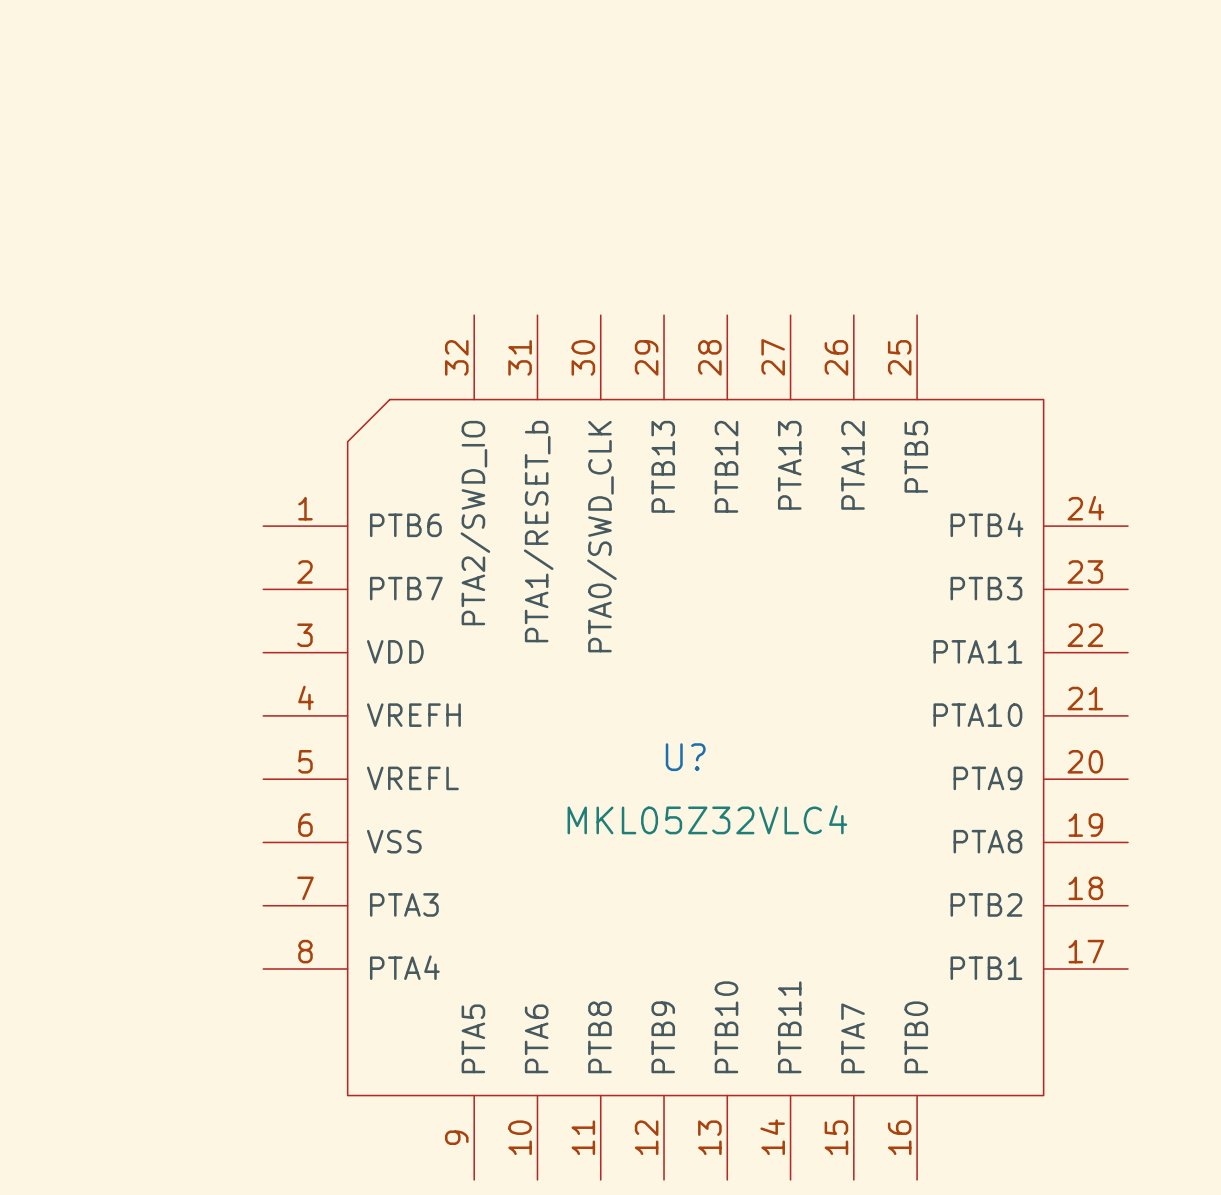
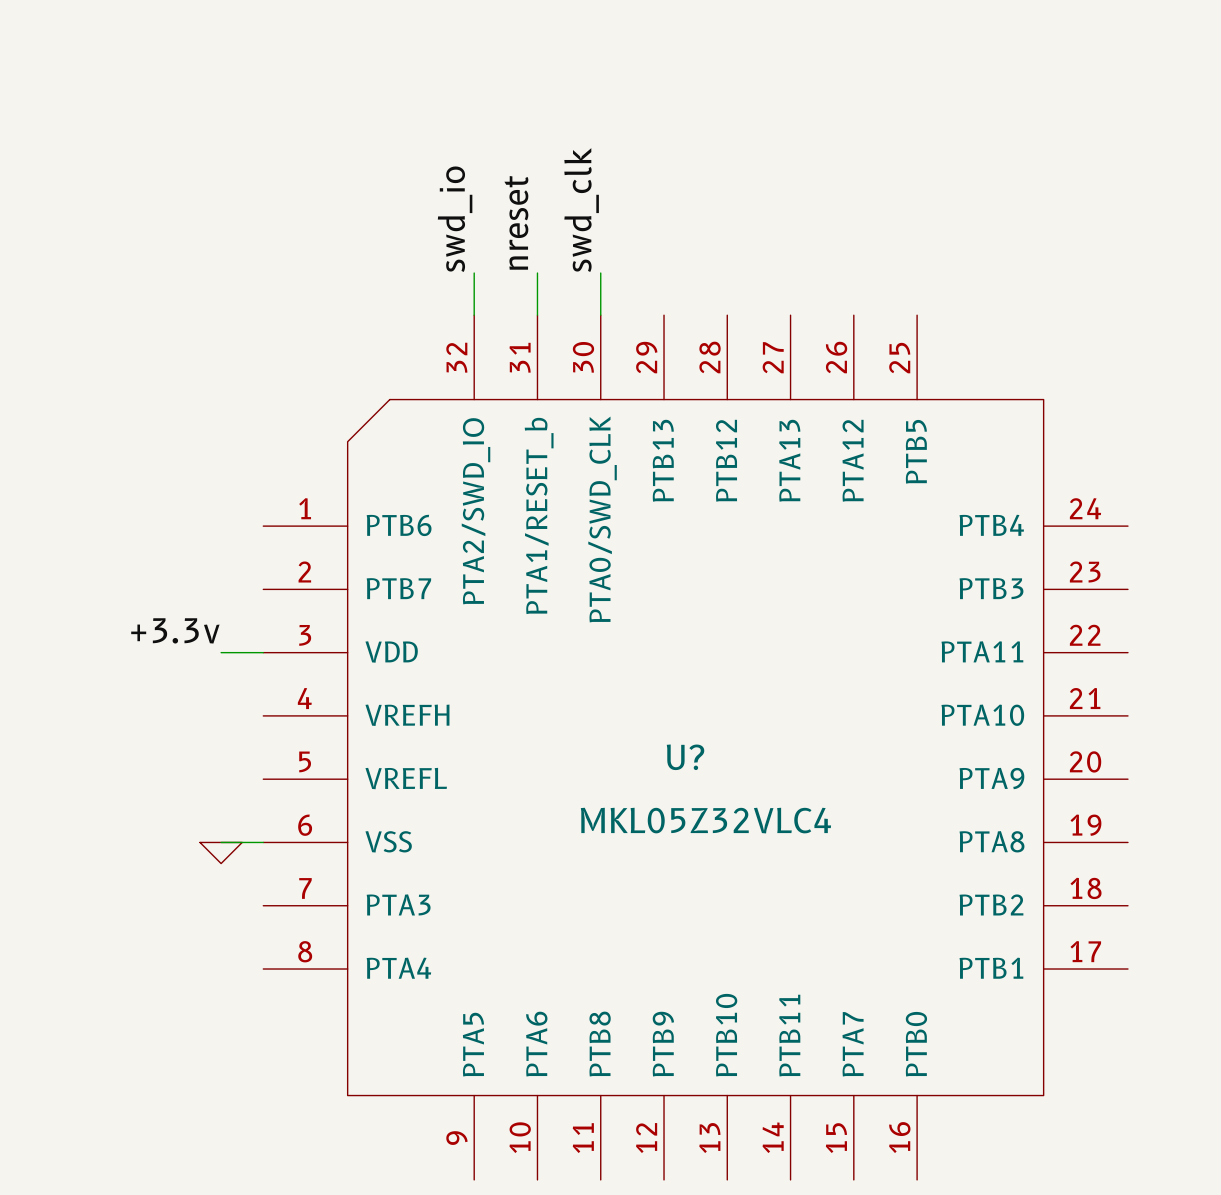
label: none -> swd_clk (581, 210)
label: none -> swd_io (455, 219)
label: none -> nreset (516, 222)
wire: none -> (474, 273) (474, 315)
wire: none -> (537, 273) (537, 315)
wire: none -> (600, 273) (600, 315)
label: none -> +3.3v (175, 630)
wire: none -> (221, 652) (263, 652)
wire: none -> (221, 842) (263, 842)
power symbol: none -> (221, 853)

